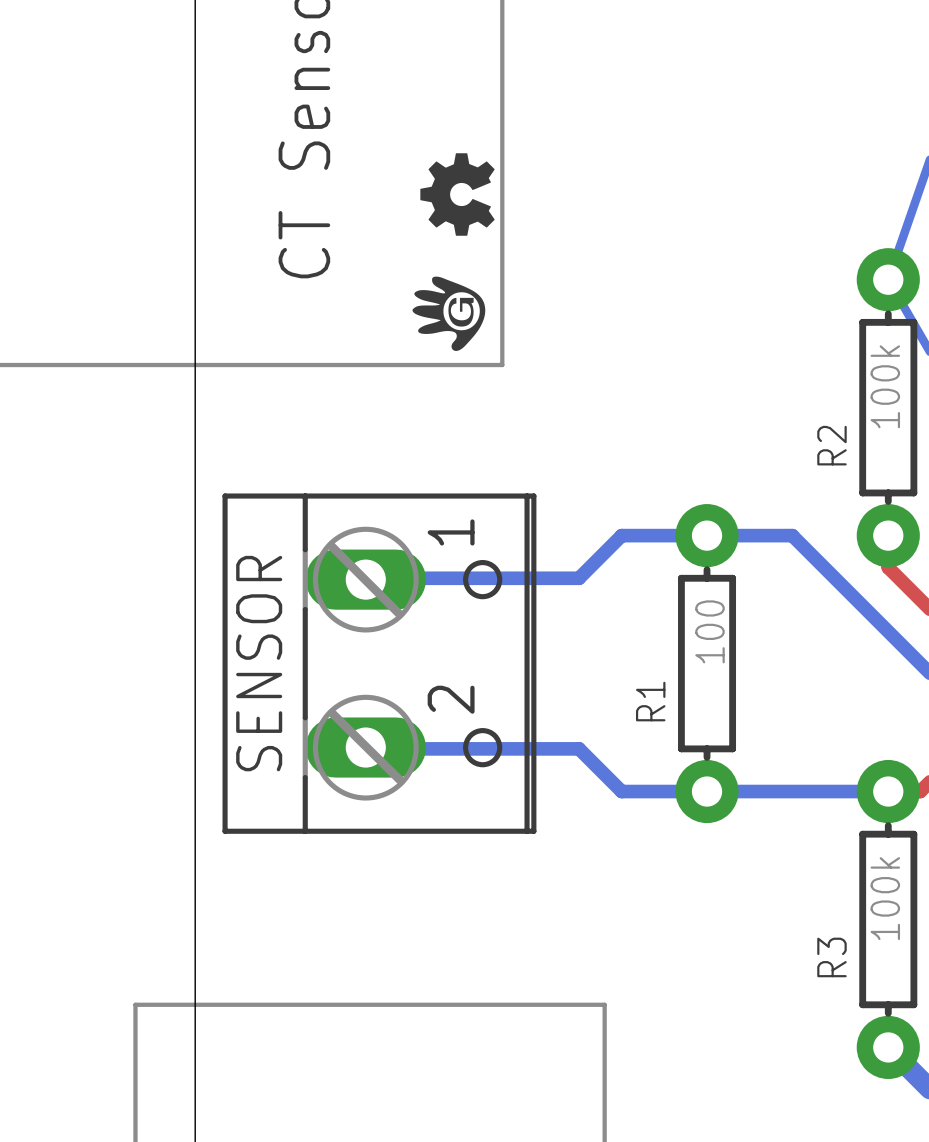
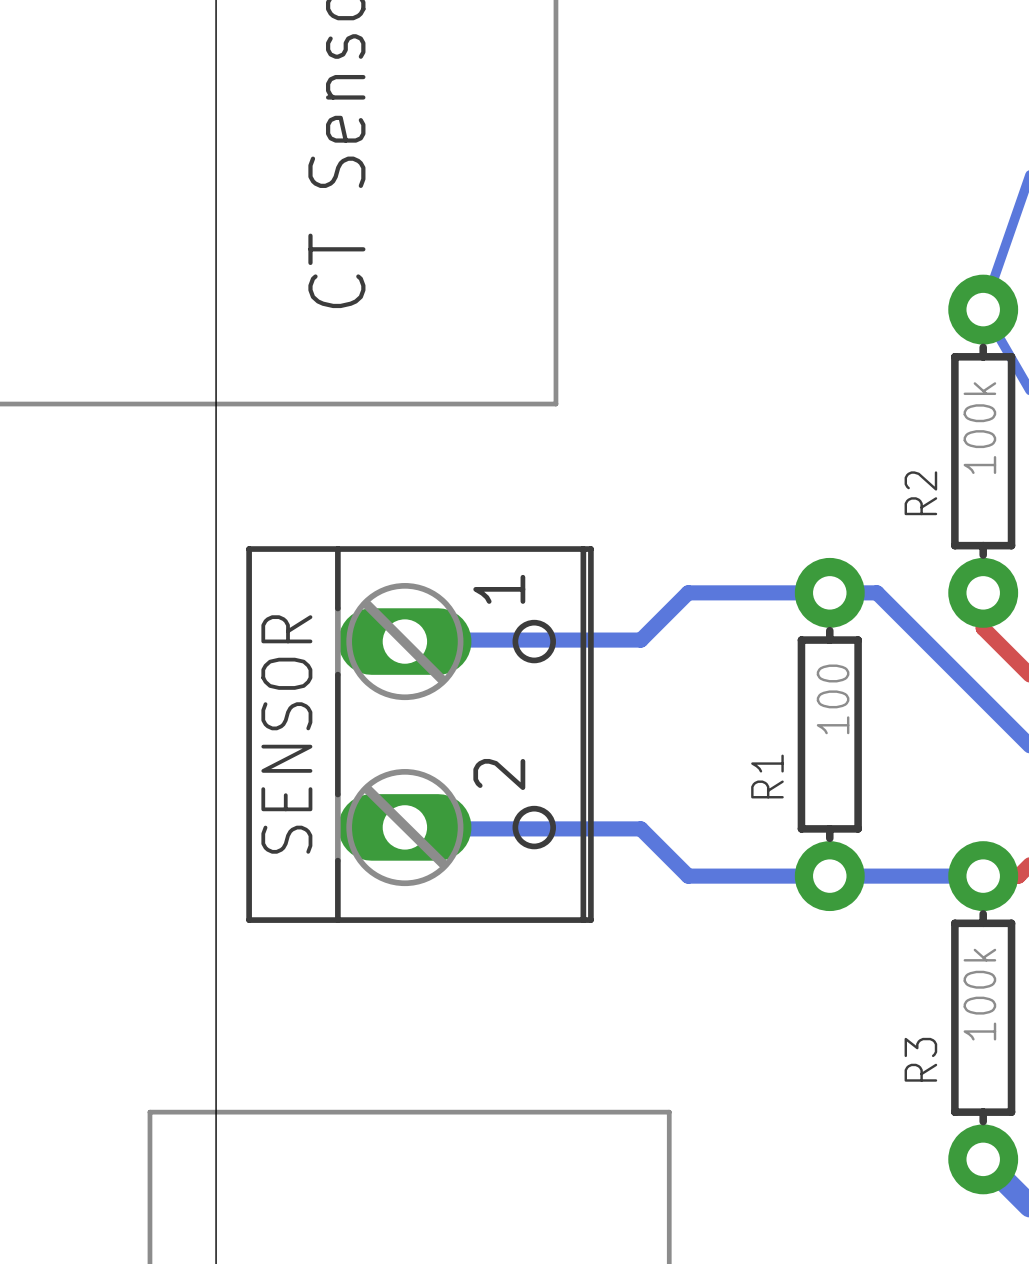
drawing: [420, 153, 495, 236] -> none
drawing: [412, 276, 486, 351] -> none
R1 position: (707, 663) -> (829, 734)

